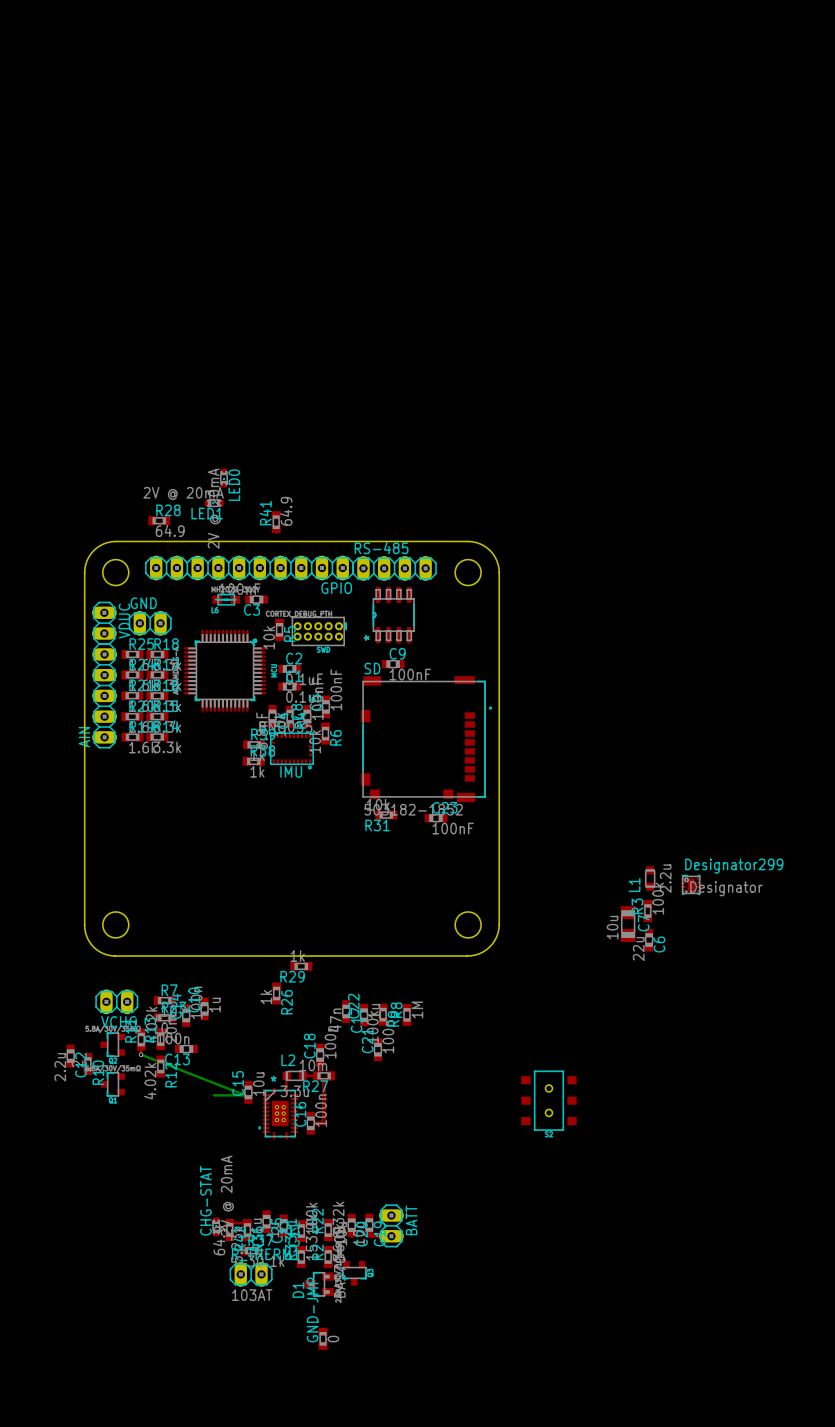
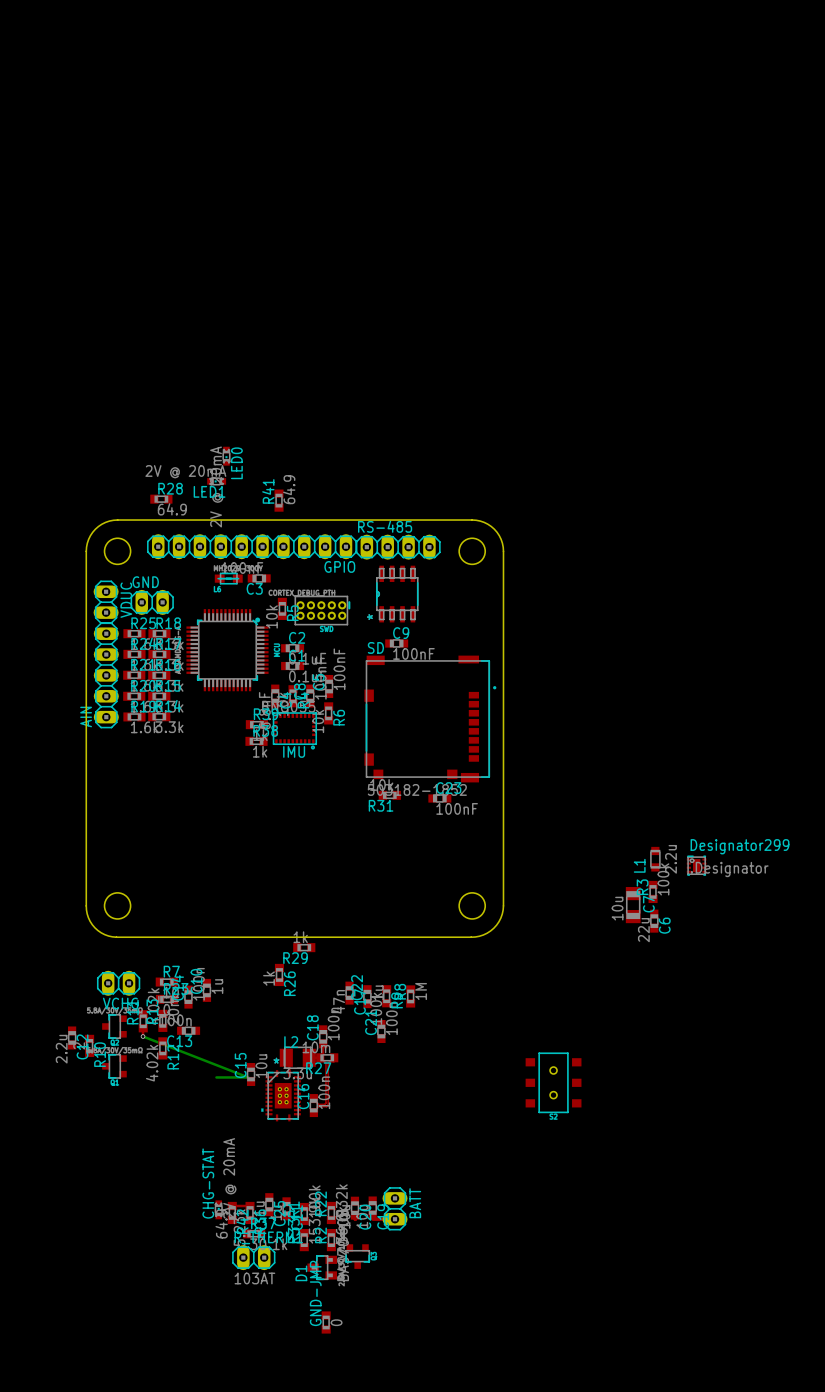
L2 footprint: [282, 1071, 308, 1081] -> [279, 1046, 316, 1069]

